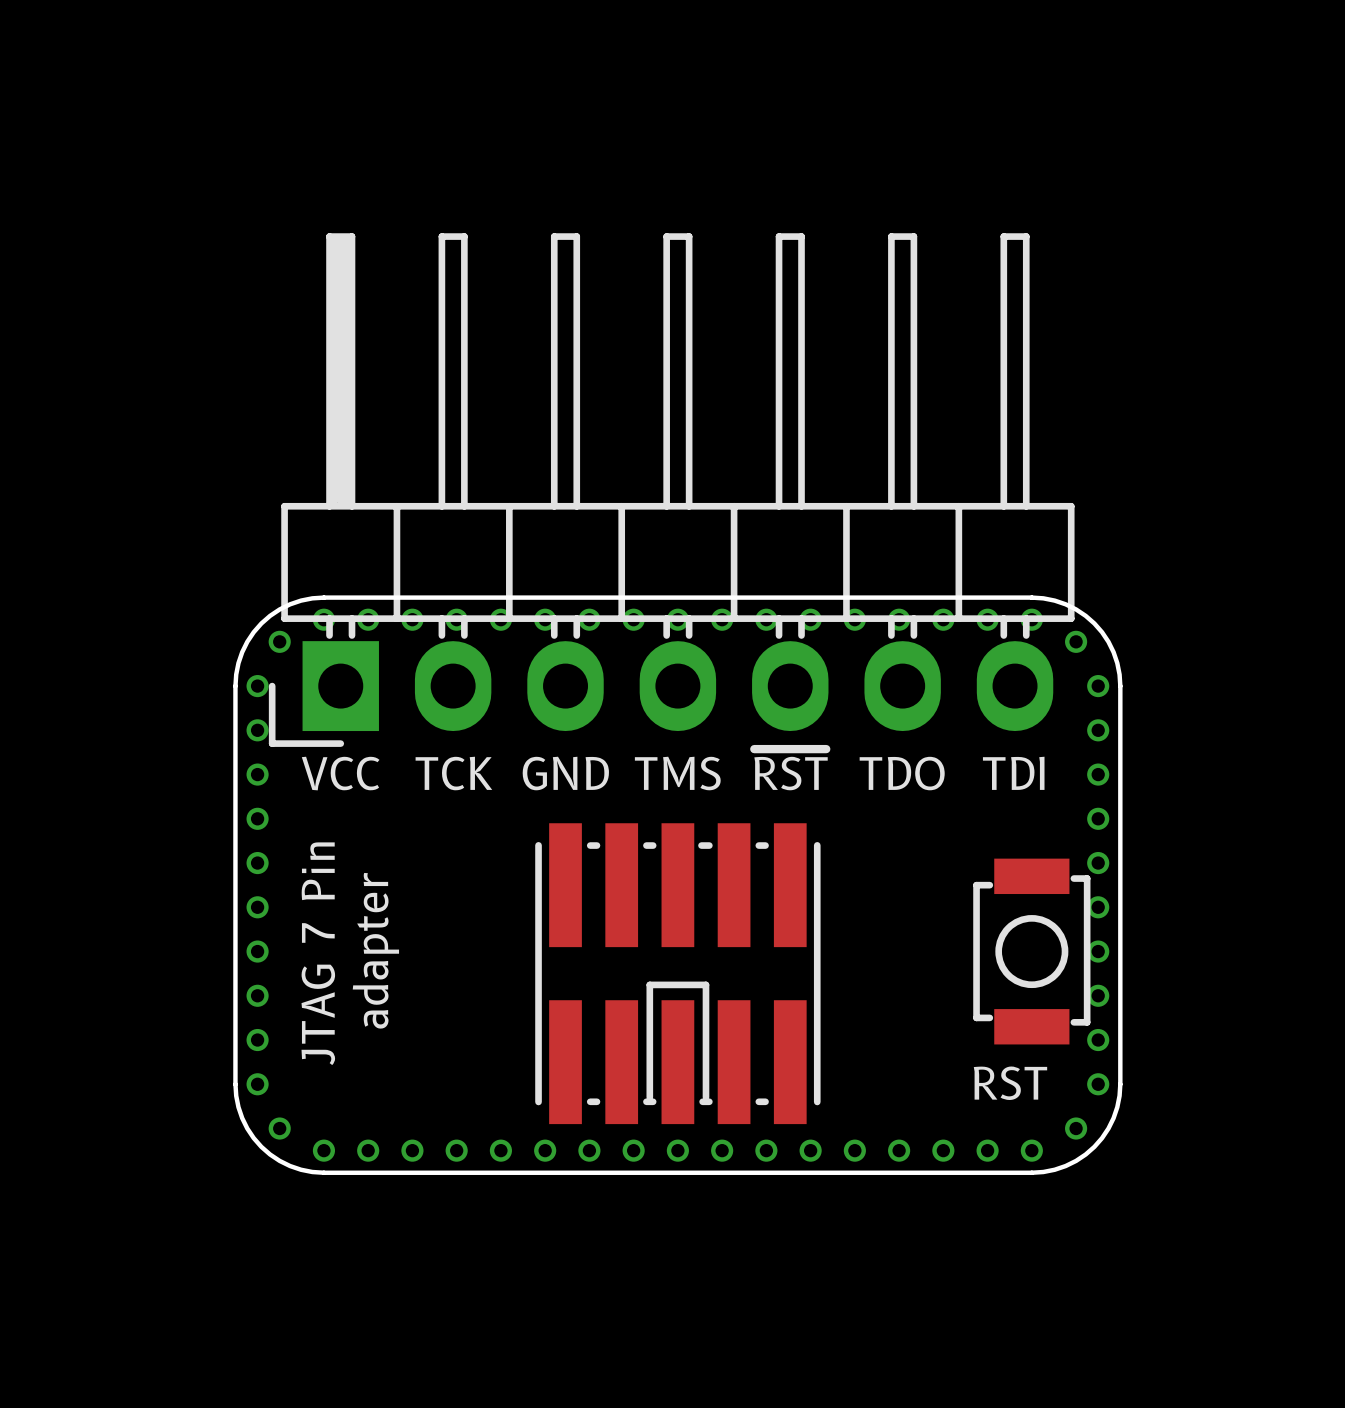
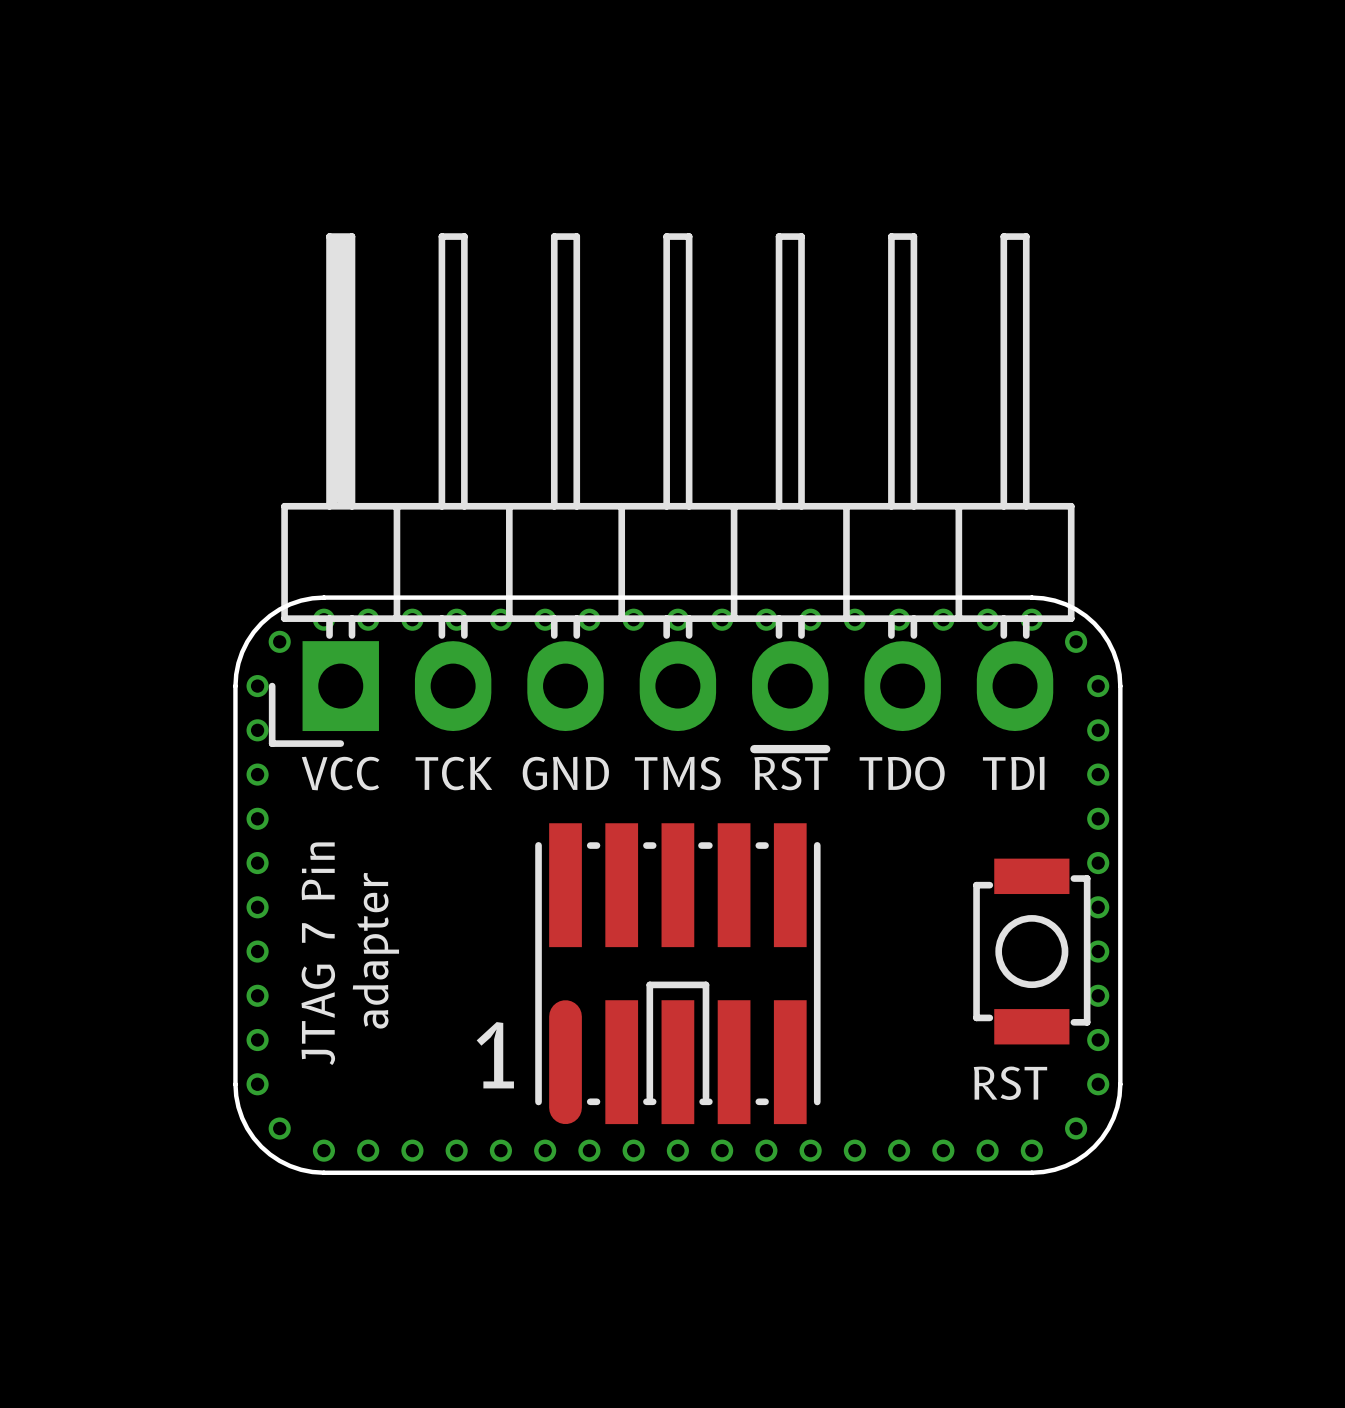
part footprint: [535, 823, 821, 1125] -> [535, 823, 821, 1125]
text: none -> 1 (495, 1055)

